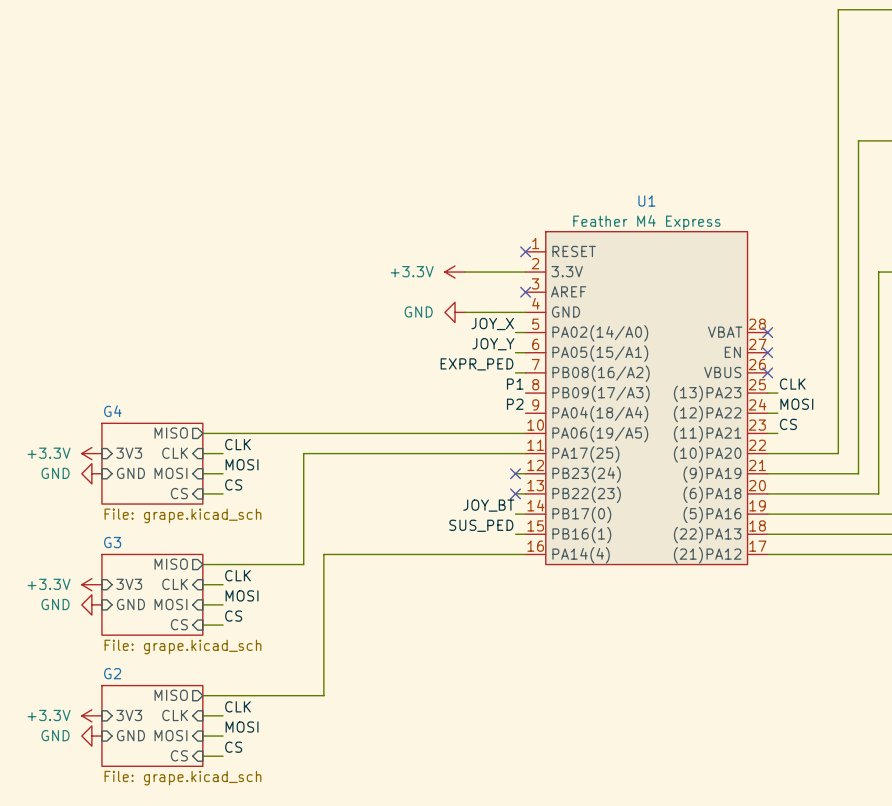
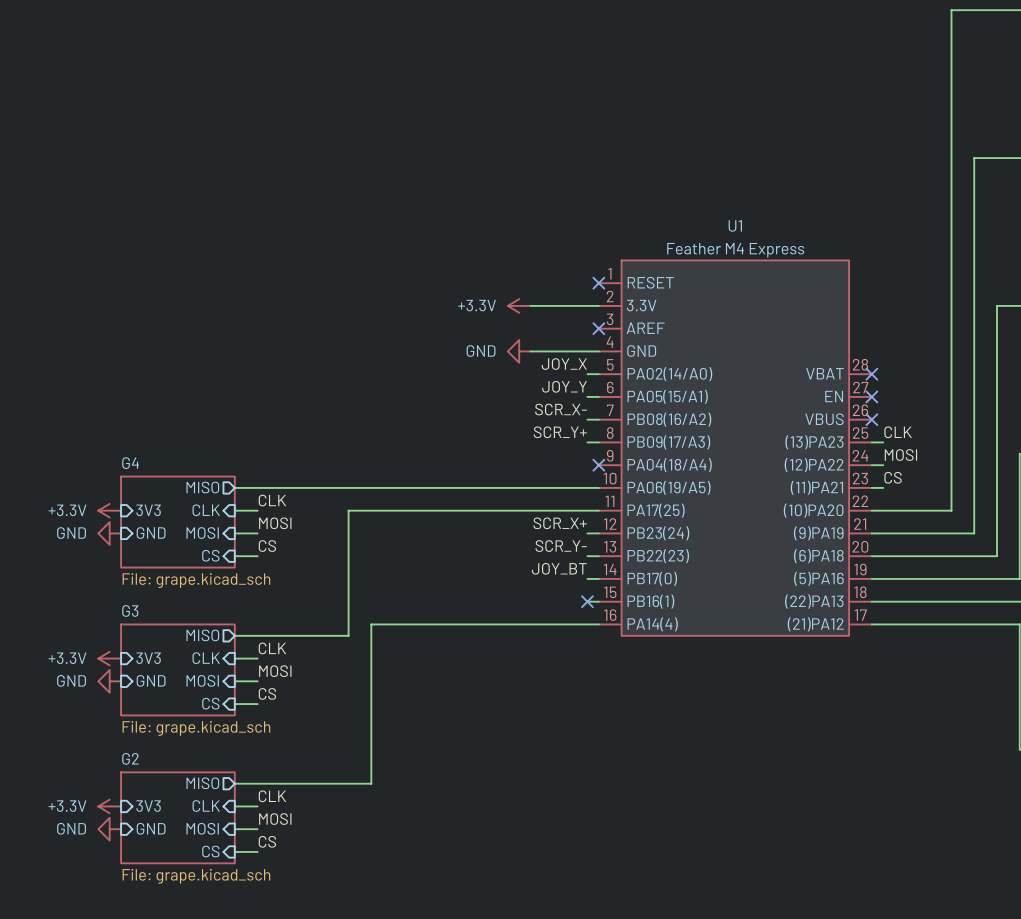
label: EXPR_PED (477, 364) -> SCR_X- (561, 409)
label: none -> SCR_Y+ (560, 432)
label: P1 (515, 384) -> none
wire: none -> (587, 442) (598, 442)
label: P2 (515, 404) -> none
no-connect mark: none -> (598, 465)
label: none -> SCR_X+ (560, 523)
no-connect mark: (515, 473) -> none
label: none -> SCR_Y- (561, 546)
no-connect mark: (515, 493) -> none
label: SUS_PED (481, 525) -> none
no-connect mark: none -> (587, 601)

